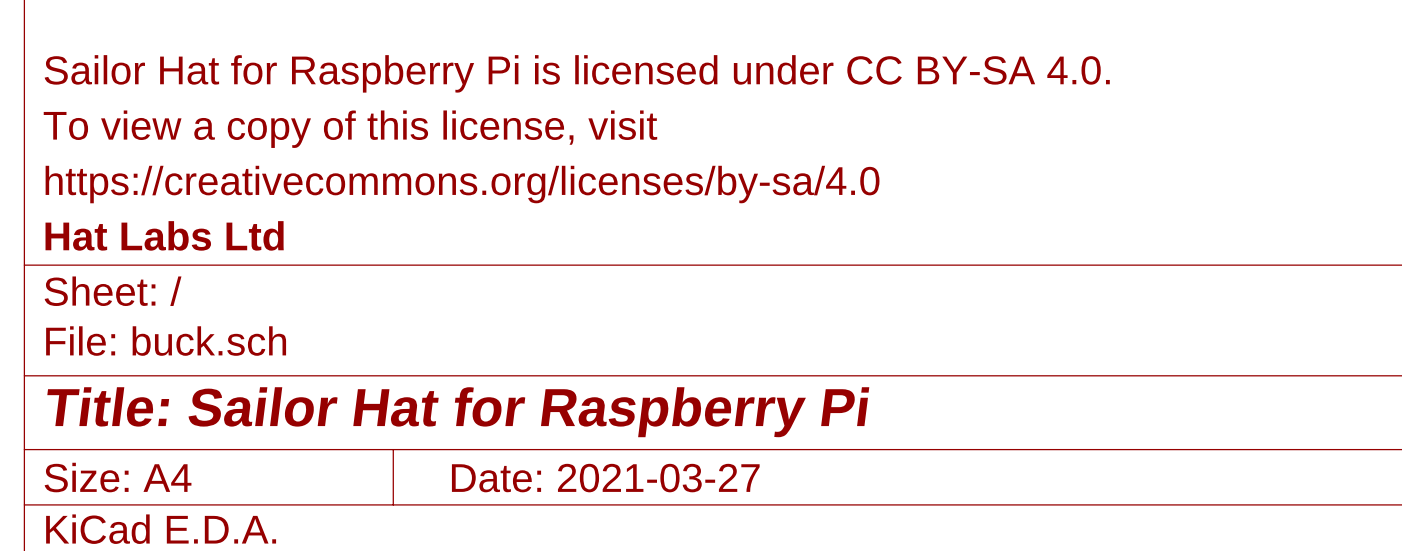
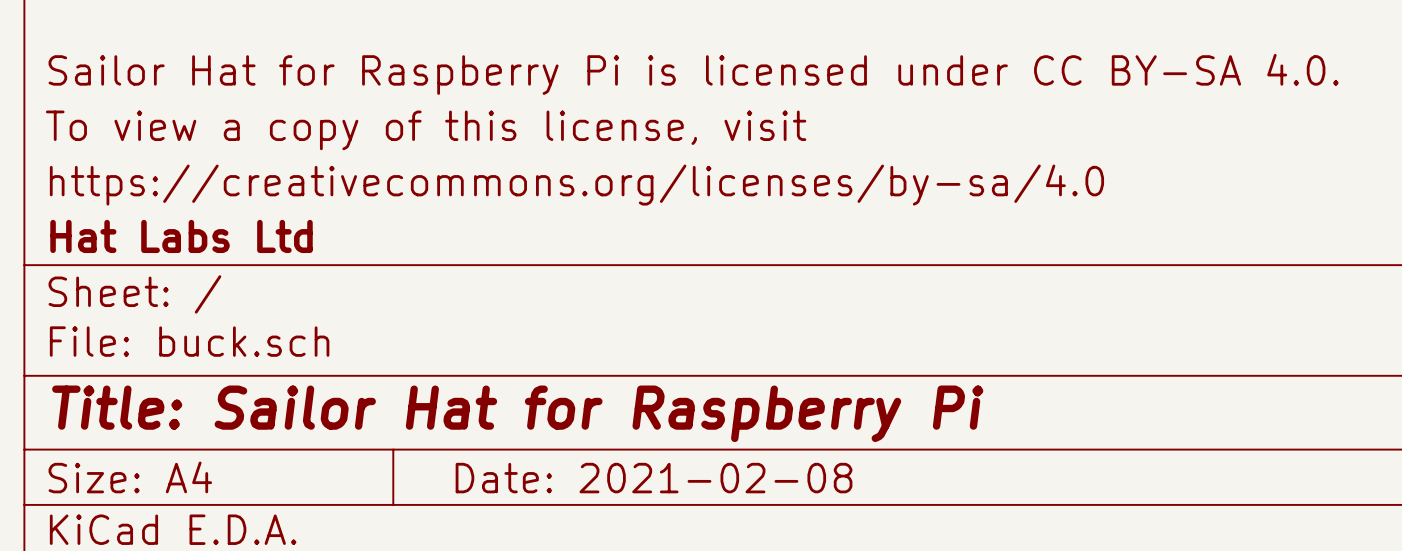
title block: Date: 2021-03-27 (605, 478) -> Date: 2021-02-08 (654, 478)

